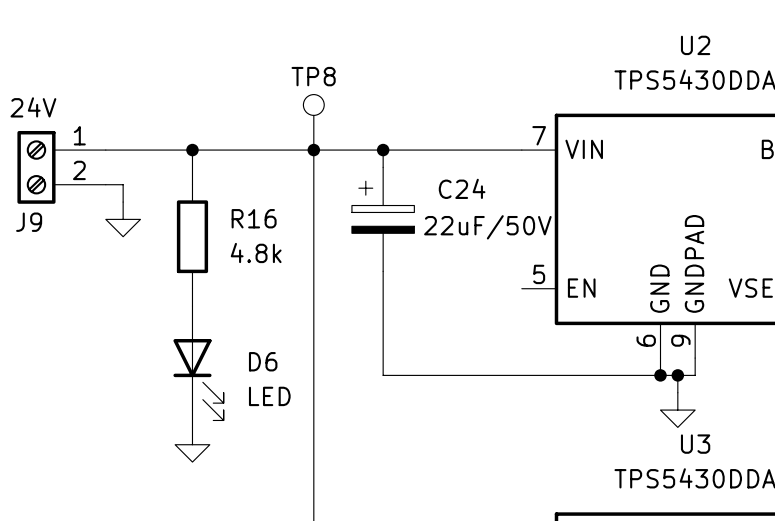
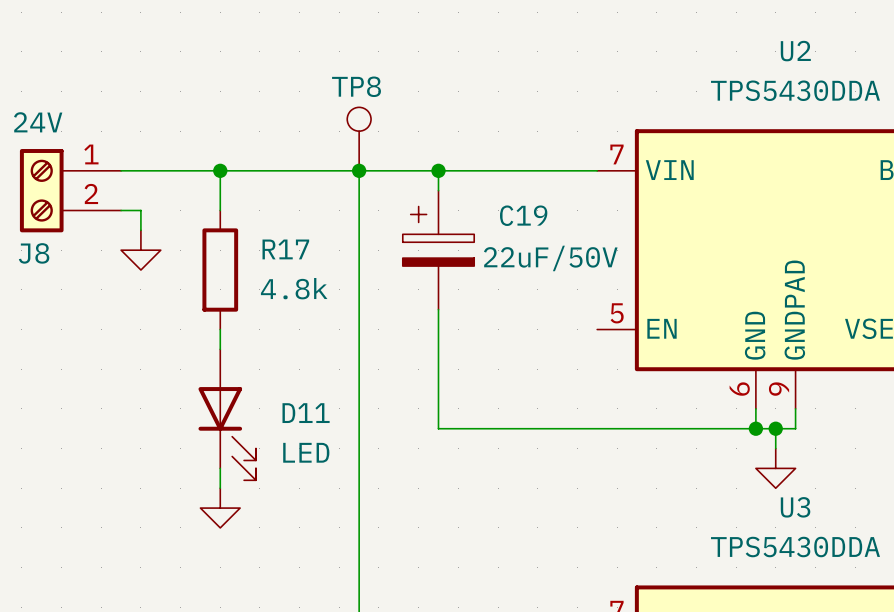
C24 name: C24 (462, 188) -> C19 (523, 215)
R16 name: R16 (254, 218) -> R17 (285, 249)
J9 name: J9 (29, 222) -> J8 (34, 253)
D6 name: D6 (263, 361) -> D11 (306, 413)

